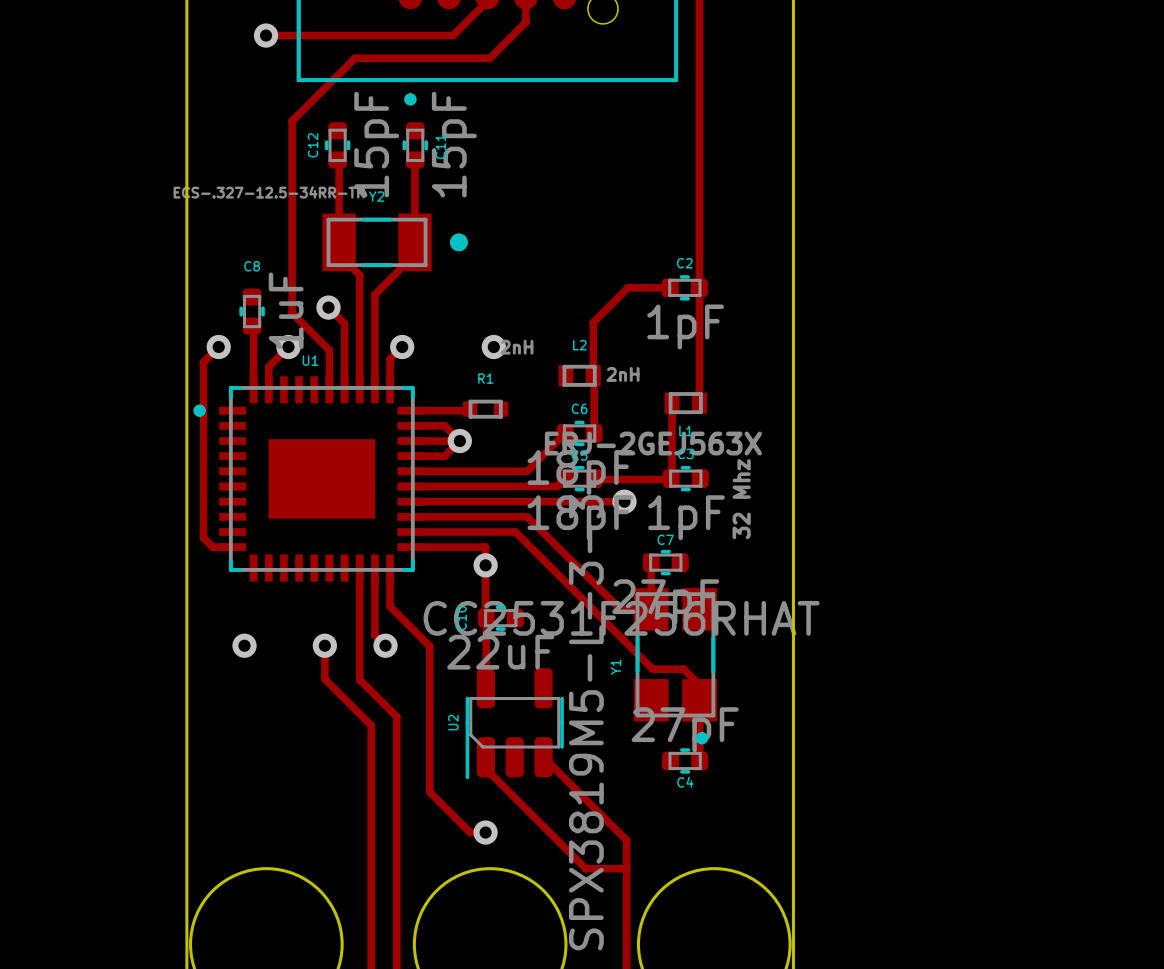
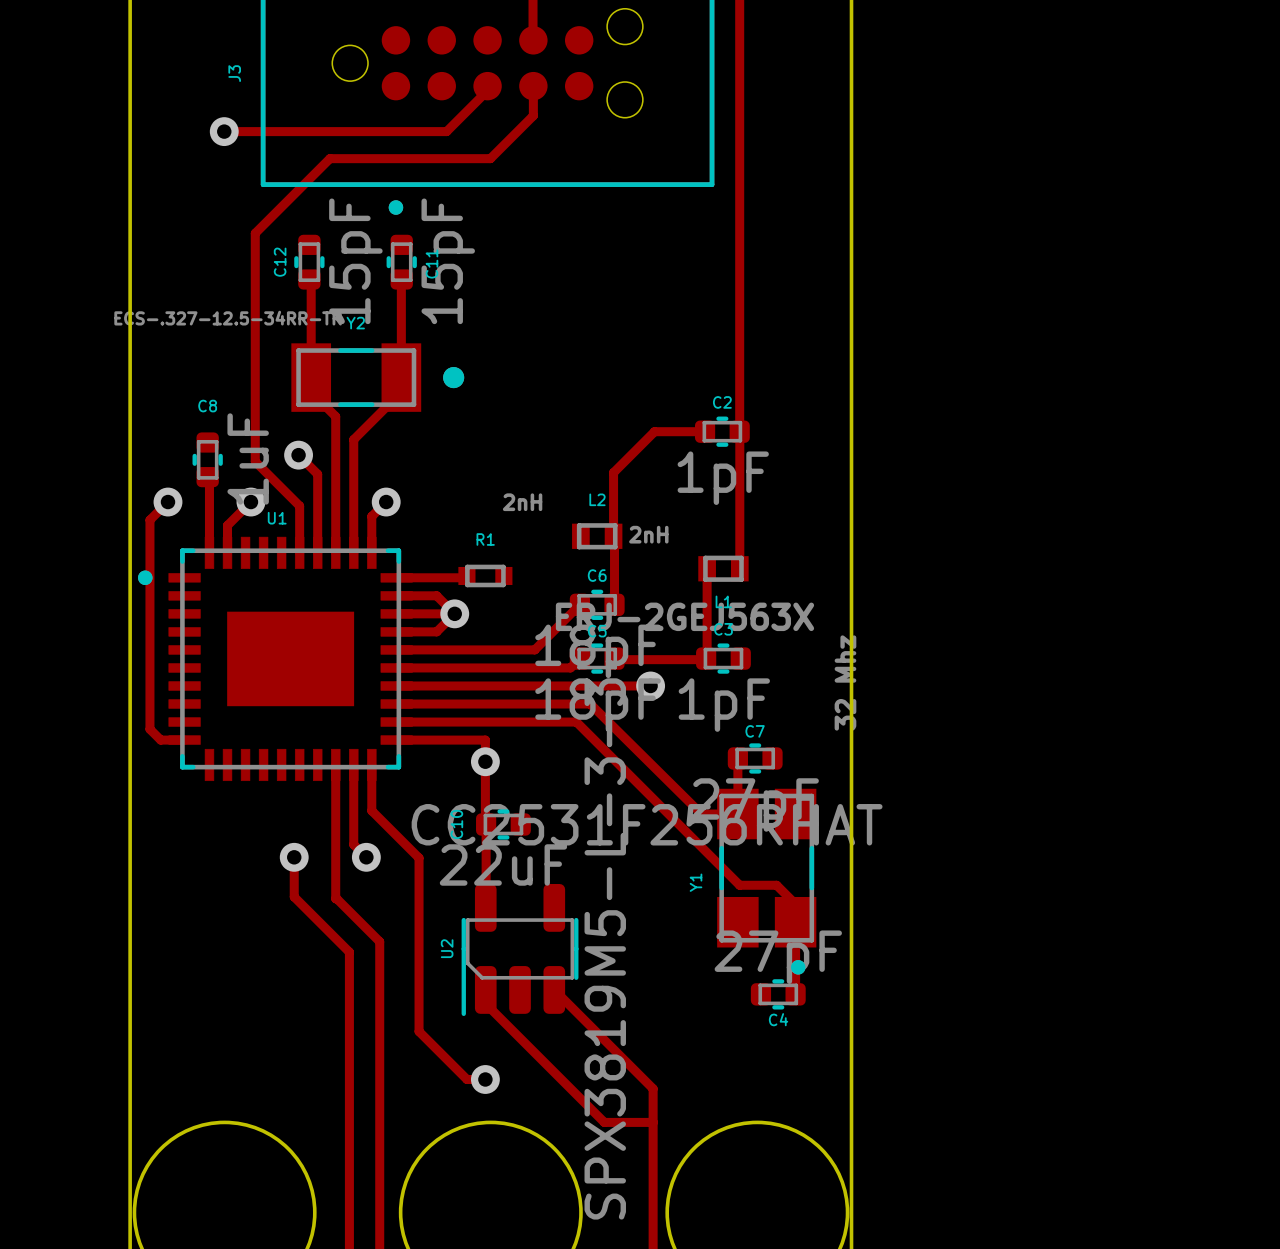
via: (493, 347) -> none
track: (527, 516) (620, 609) (651, 609) (651, 562) -> (535, 704) (590, 704) (701, 814) (737, 814) (737, 758)
track: (515, 532) (652, 669) (683, 669) (699, 685) (699, 760) -> (521, 722) (576, 722) (739, 885) (776, 885) (795, 904) (795, 994)
C7 position: (665, 562) -> (755, 758)
via: (244, 645) -> none
Y1 position: (675, 666) -> (766, 881)
C4 position: (685, 760) -> (778, 994)

